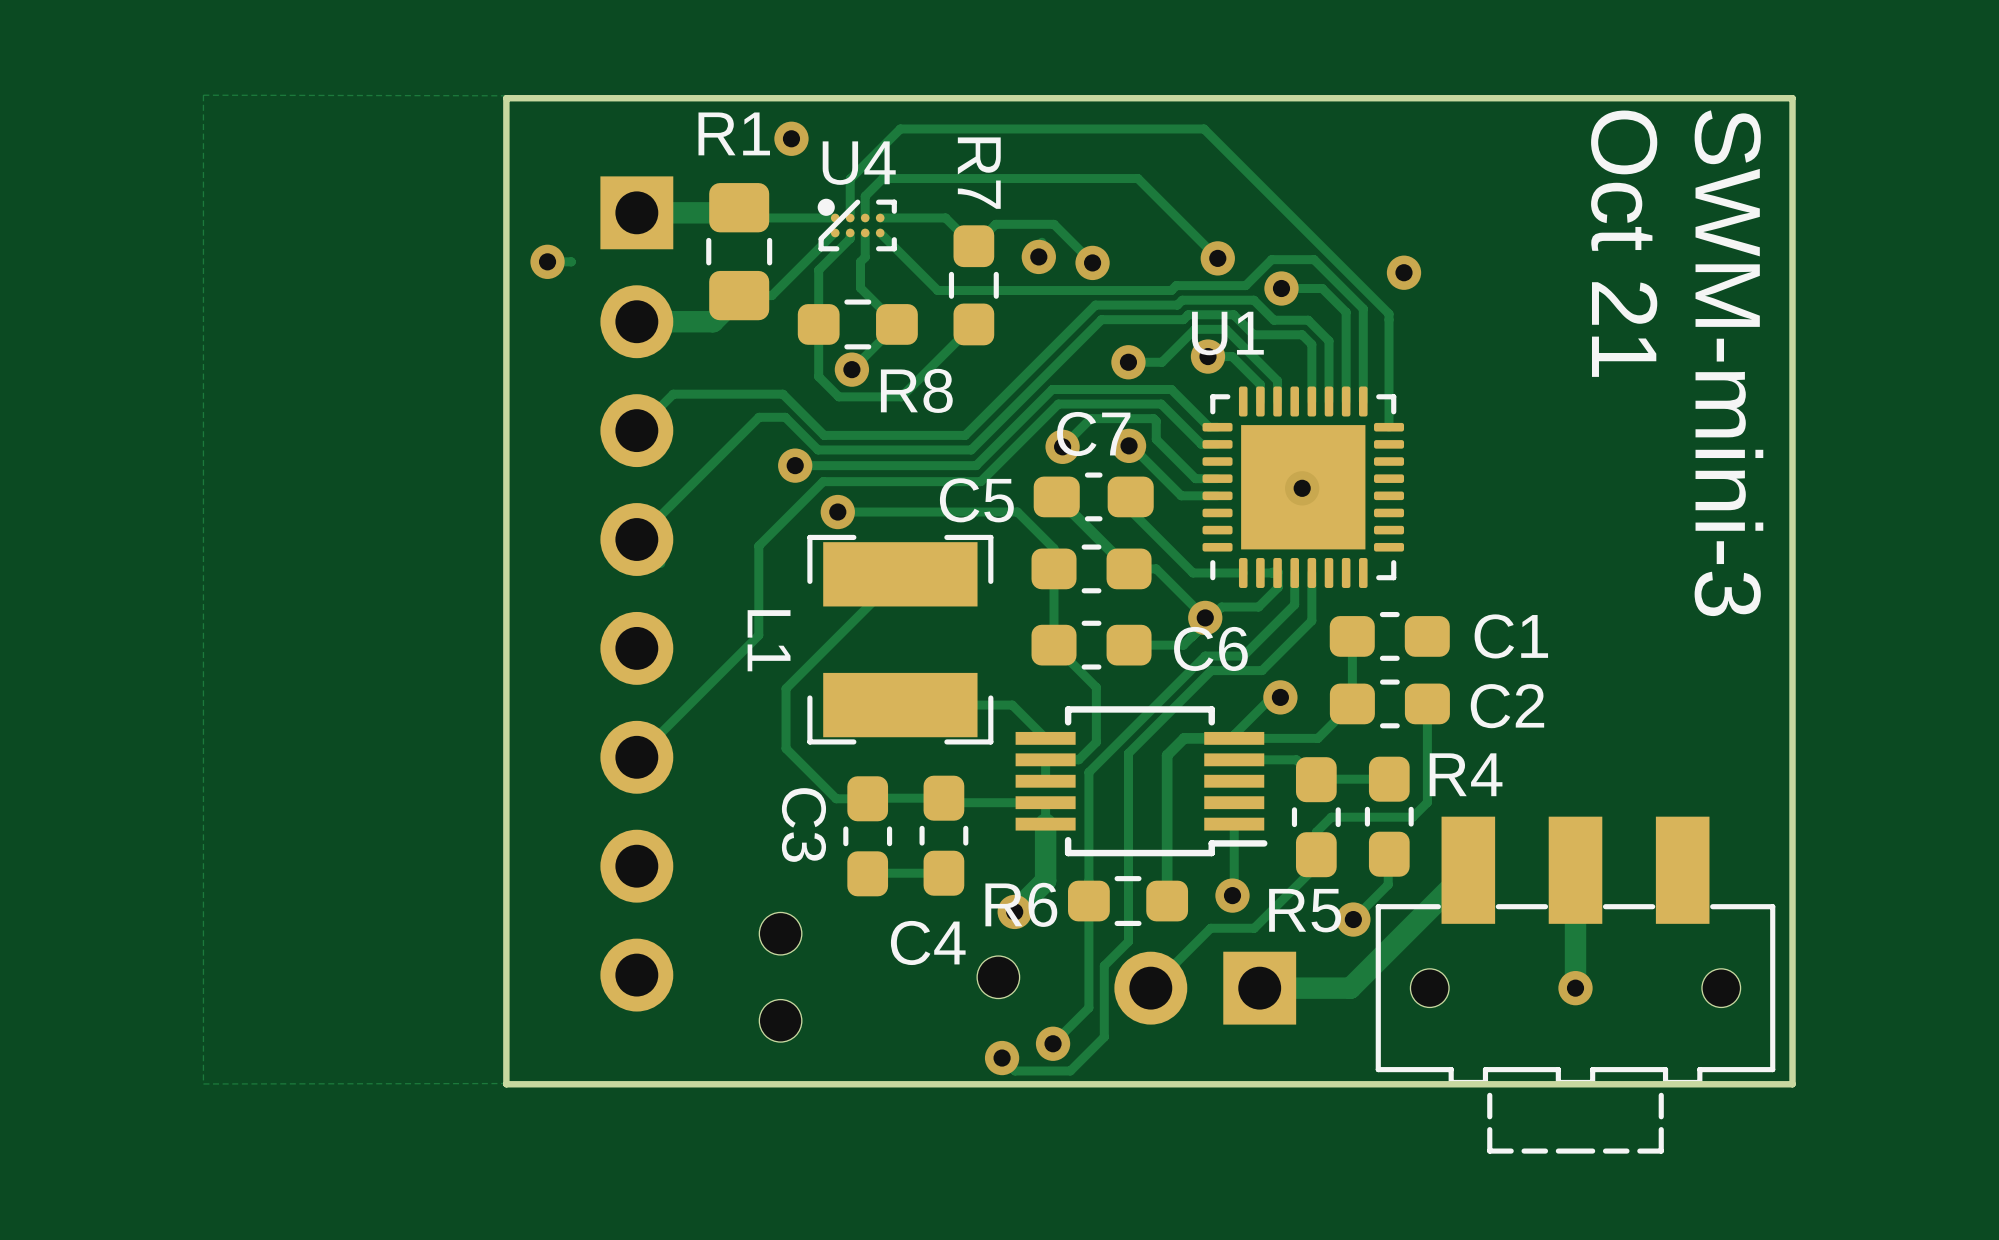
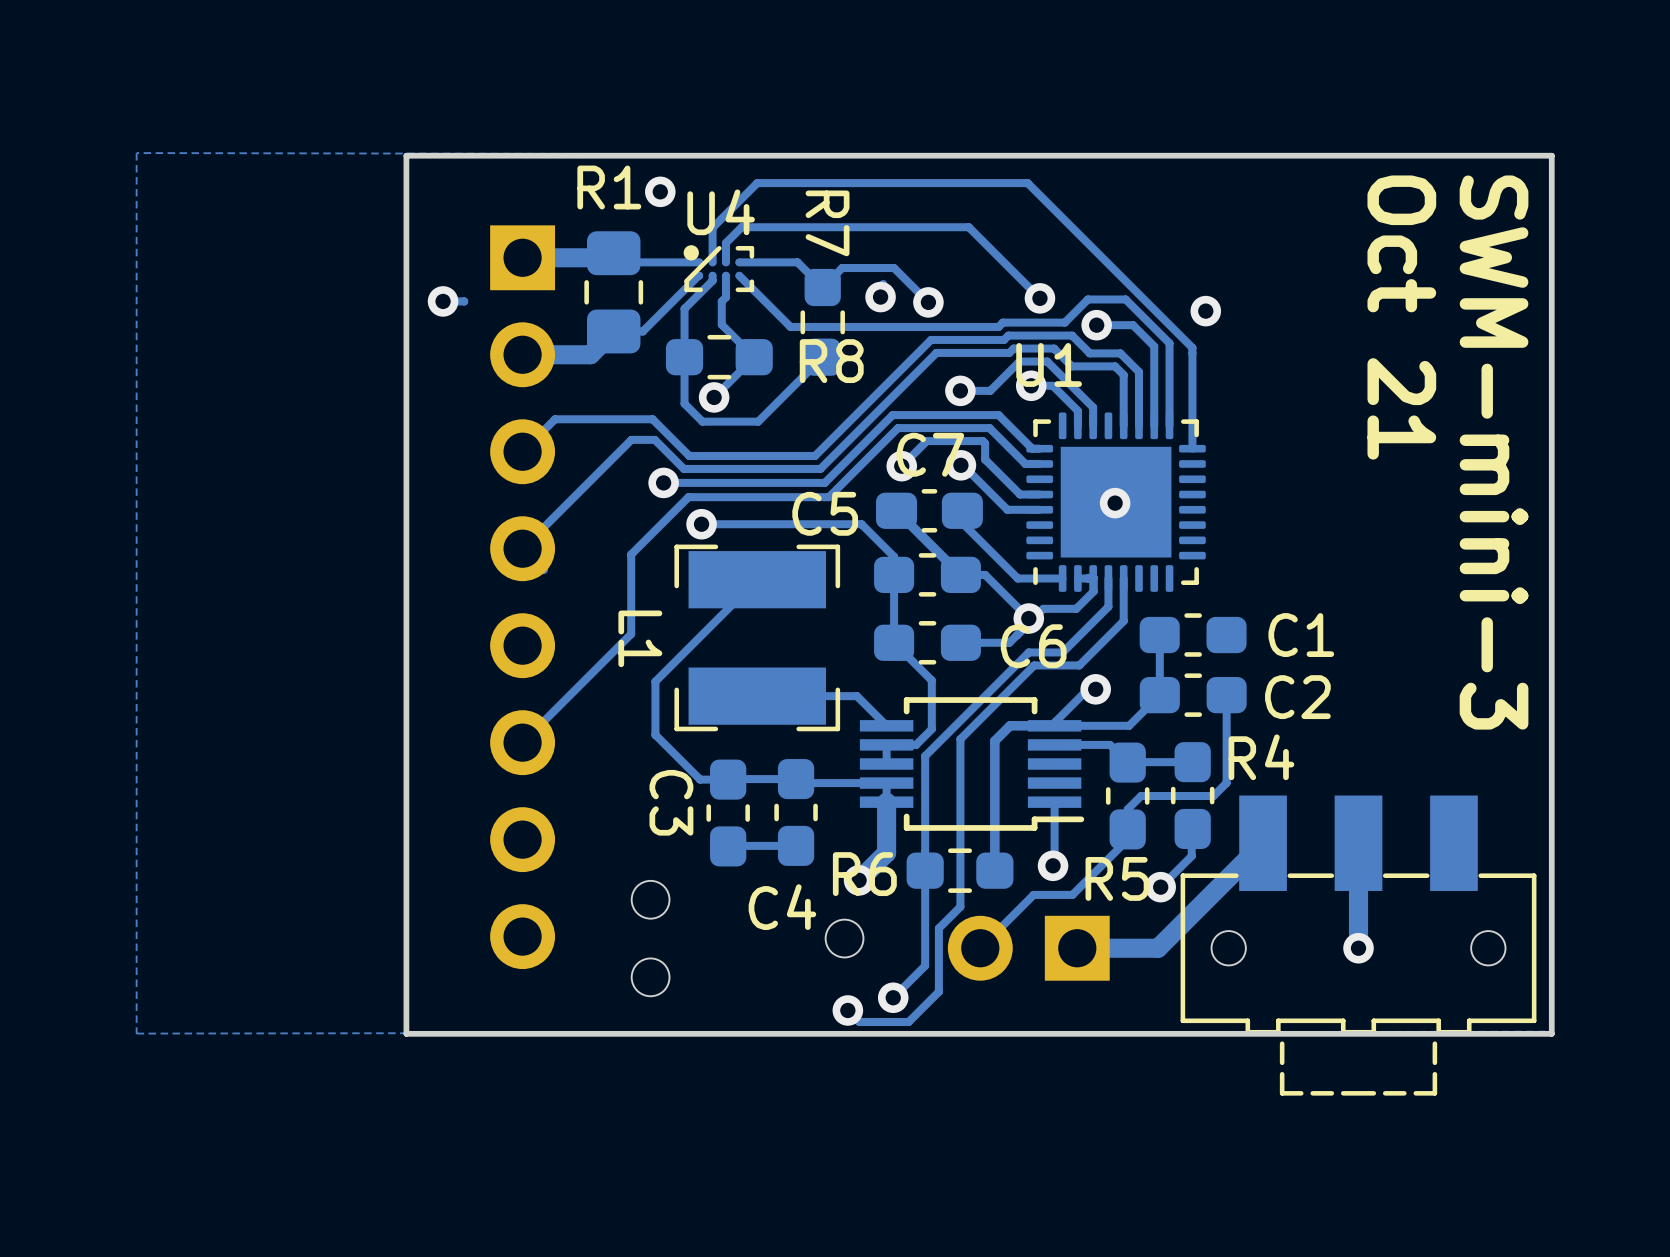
R8 name position: R8 (916, 390) -> R8 (831, 361)

